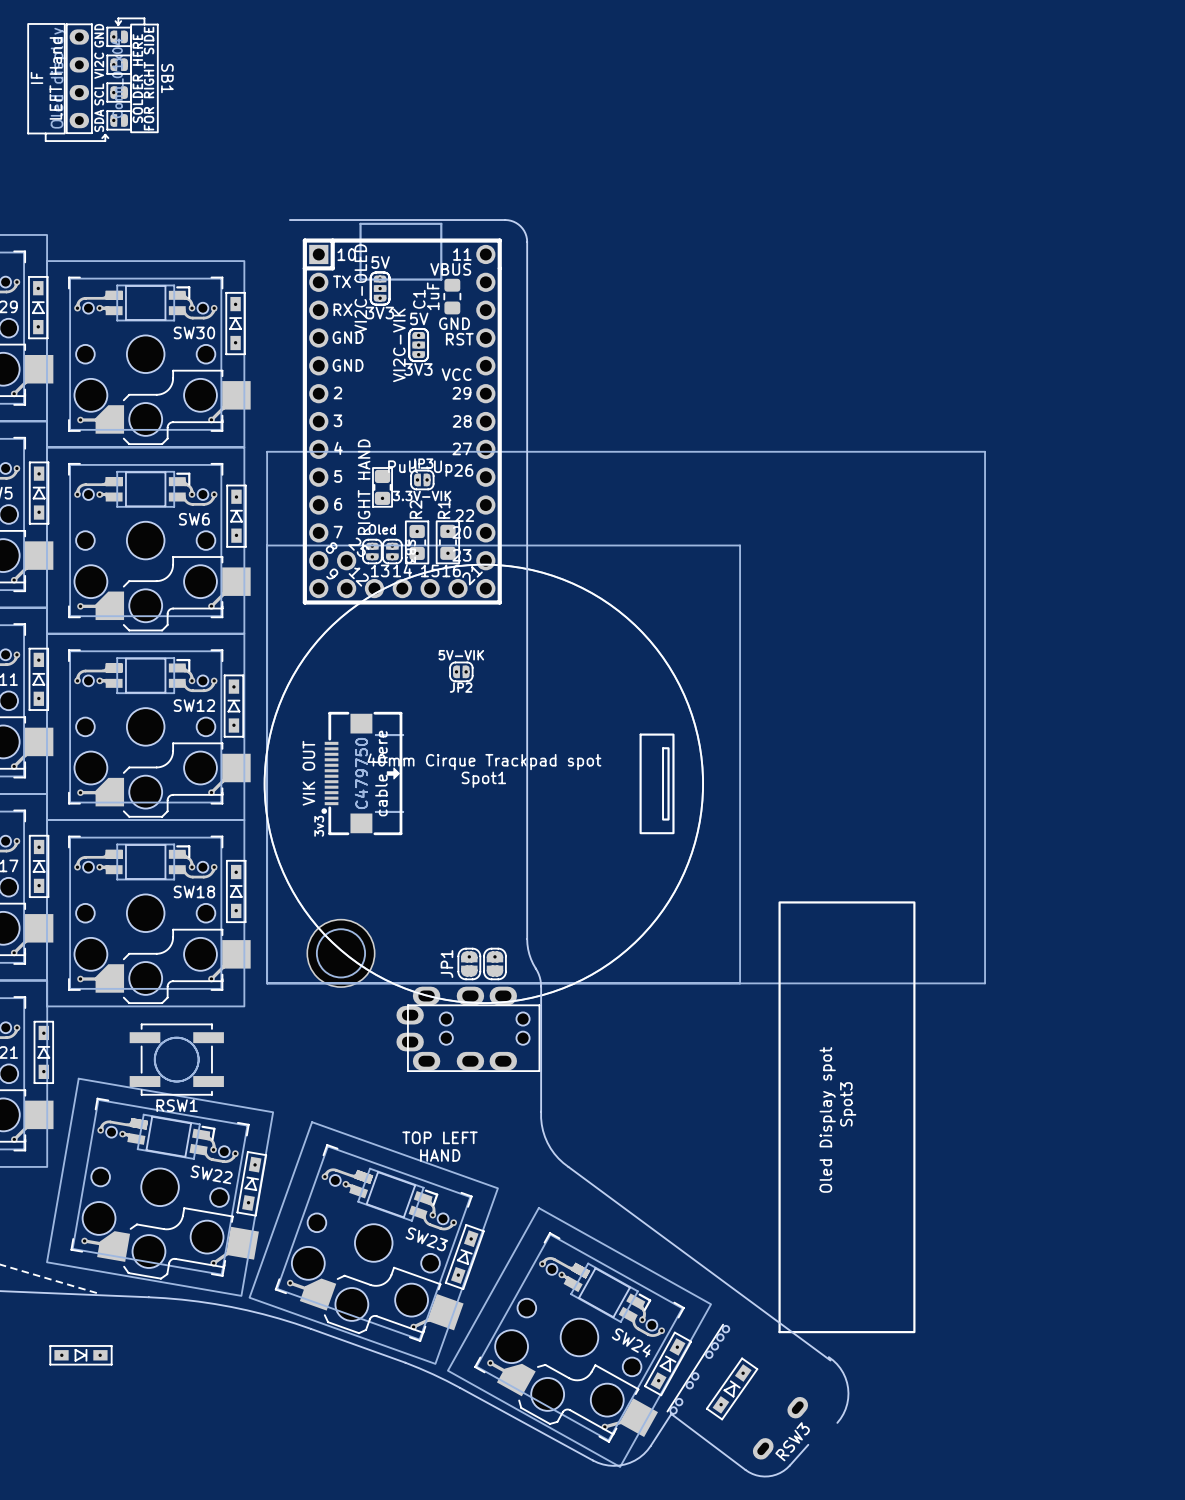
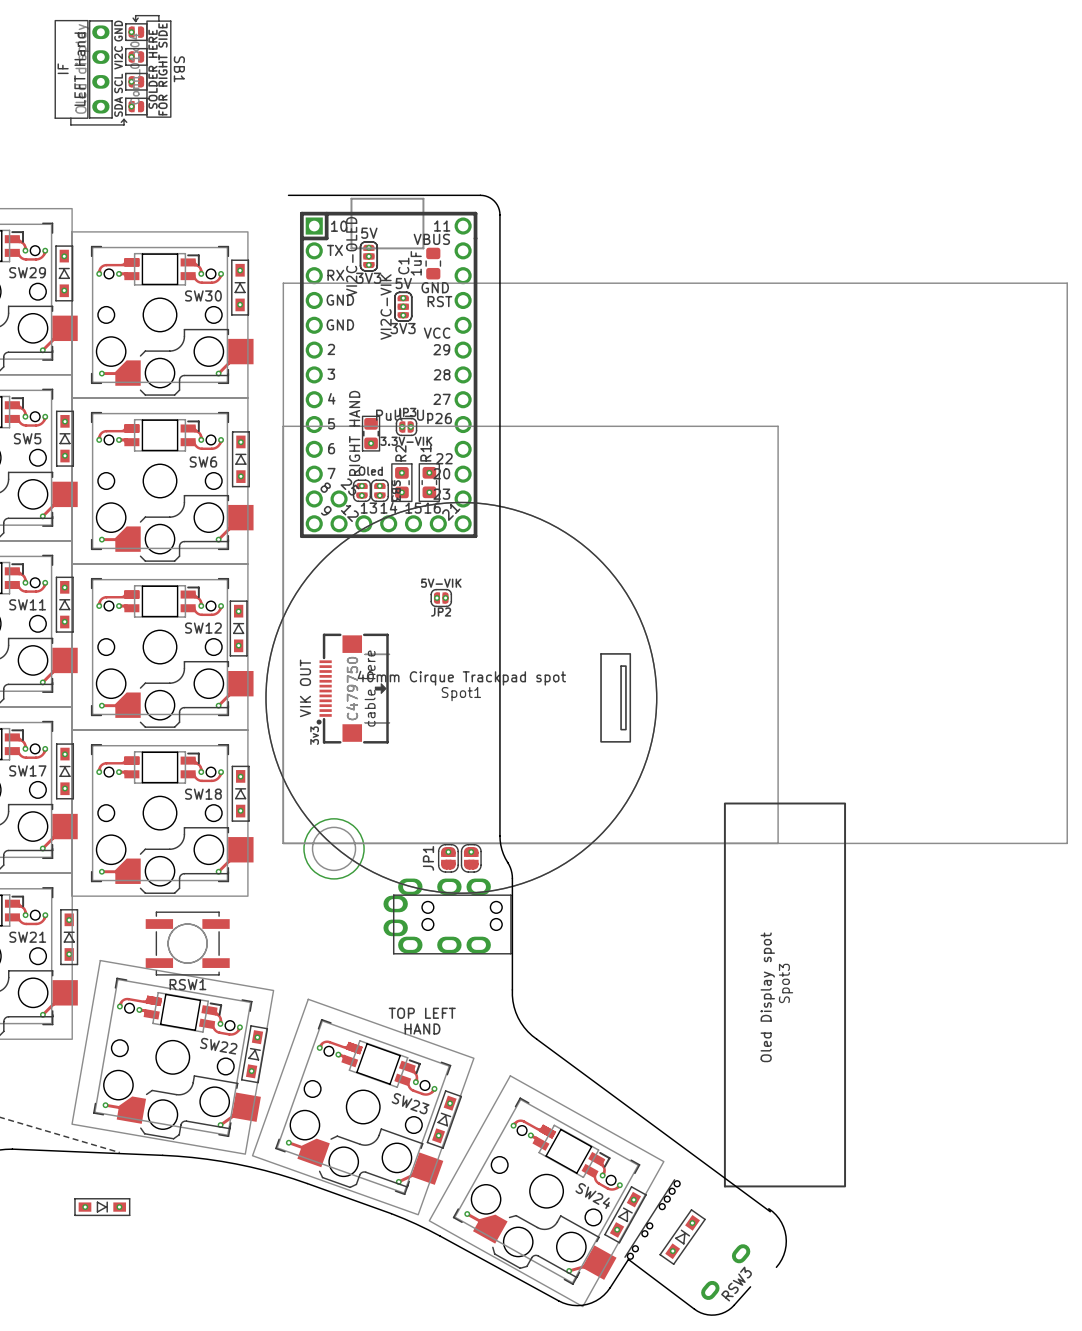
line: (267, 451) (267, 983) (985, 983) (985, 451) (267, 451) -> (283, 283) (283, 843) (1067, 843) (1067, 283) (283, 283)
line: none -> (283, 426) (778, 426) (778, 843)
line: (267, 545) (740, 545) (740, 983) -> none

